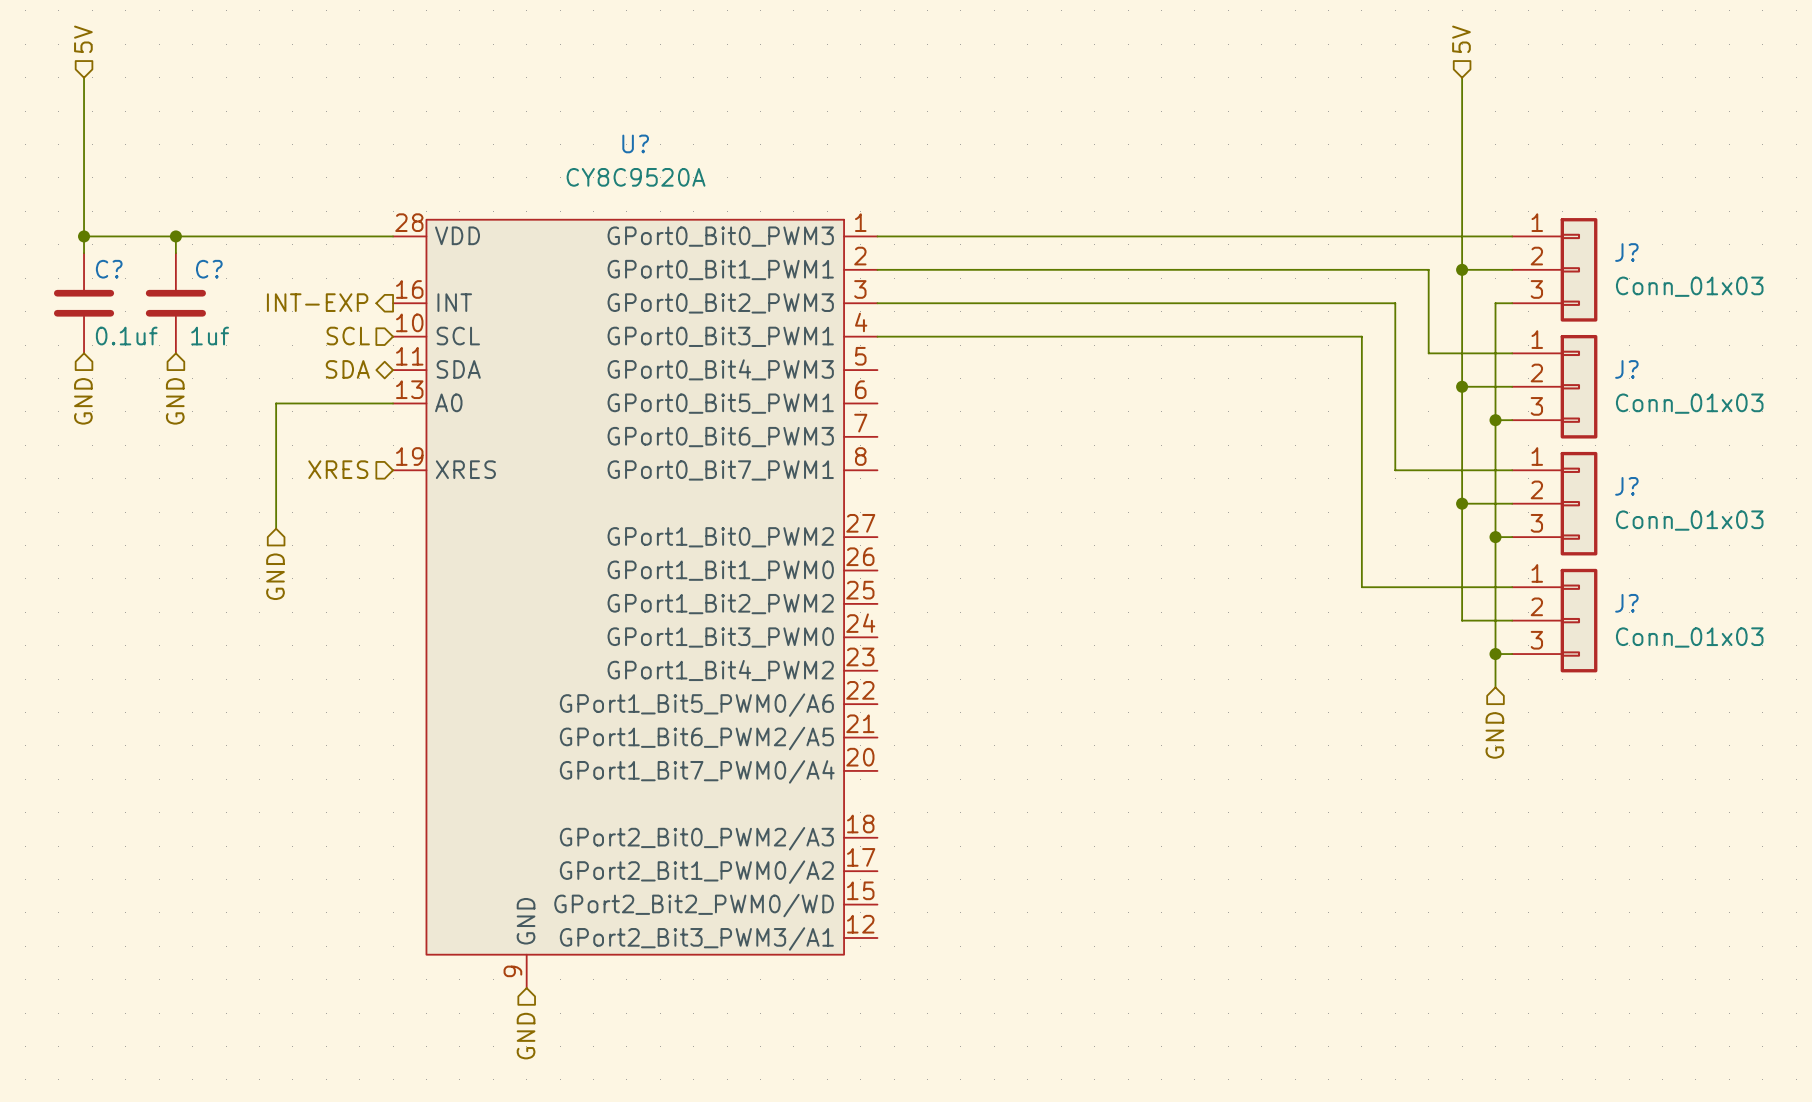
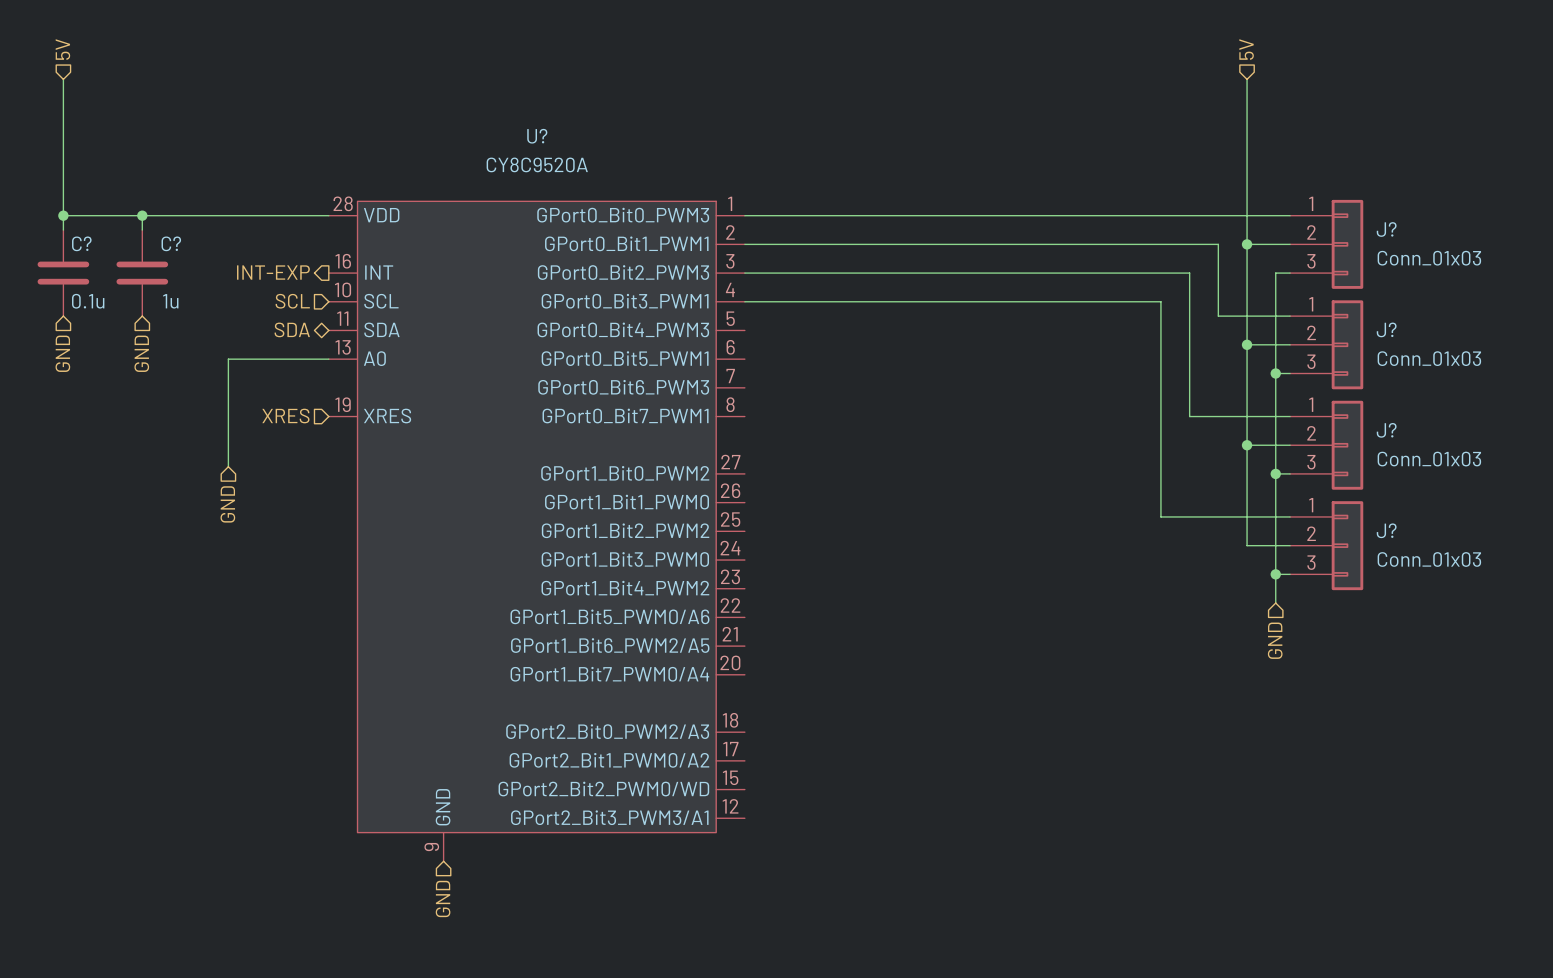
C? value: 0.1uf (126, 336) -> 0.1u (88, 301)
C? value: 1uf (210, 336) -> 1u (170, 301)

